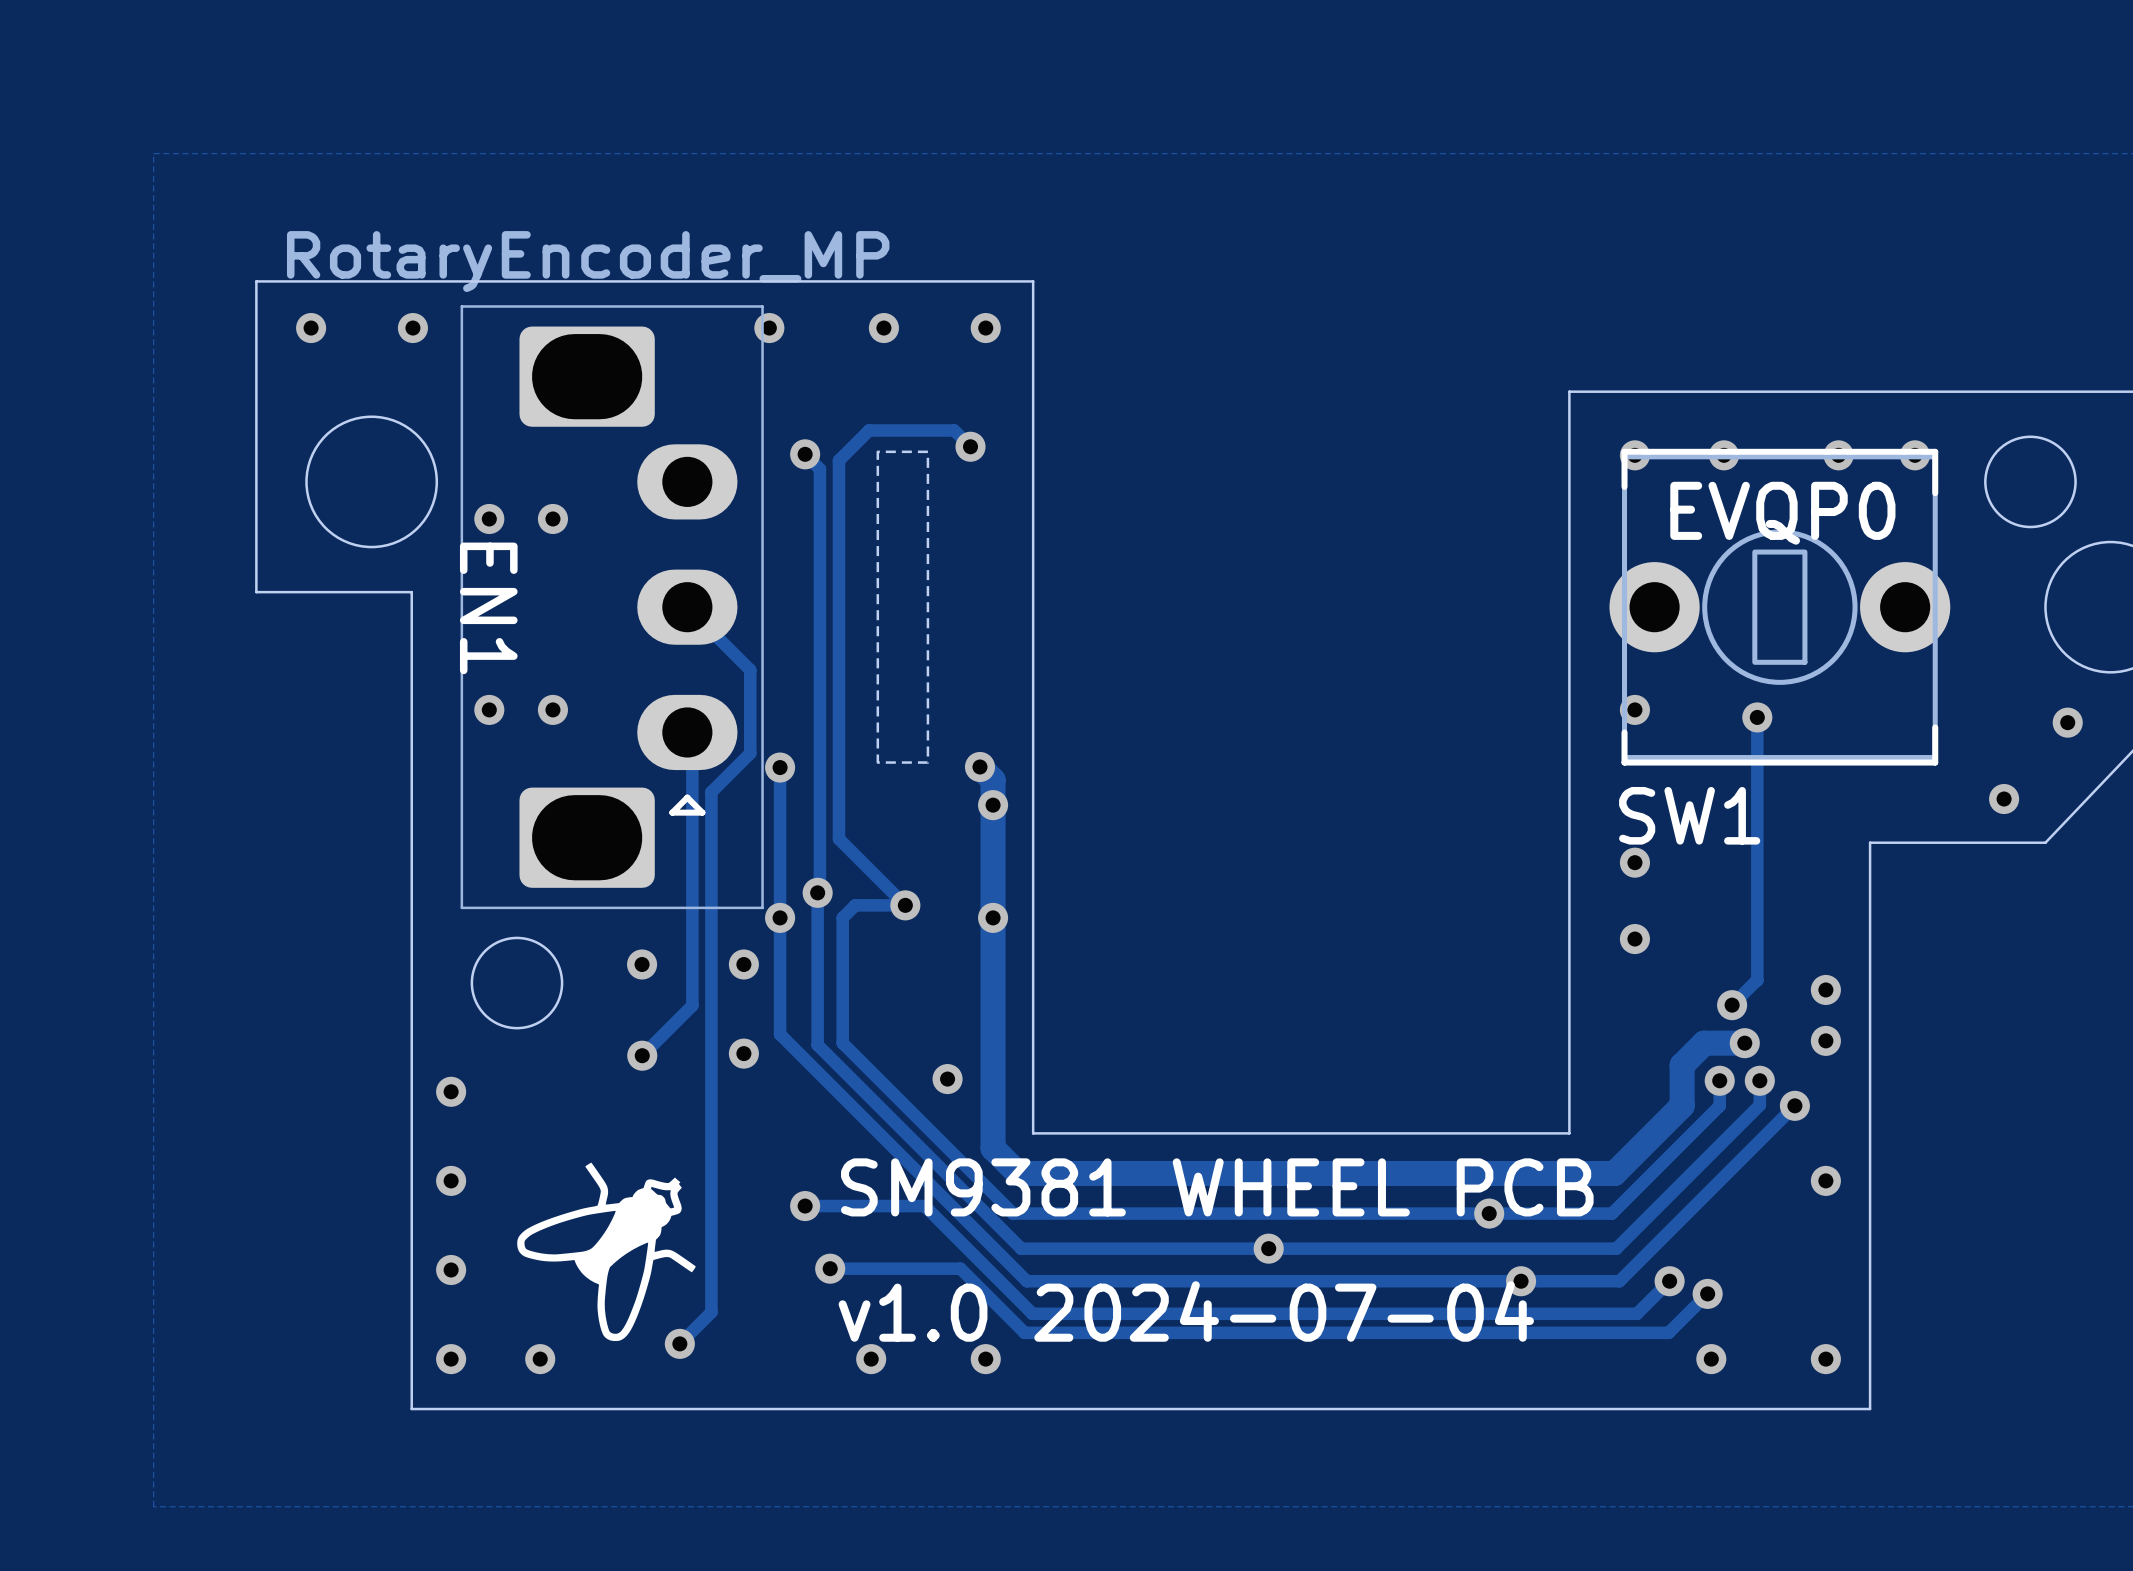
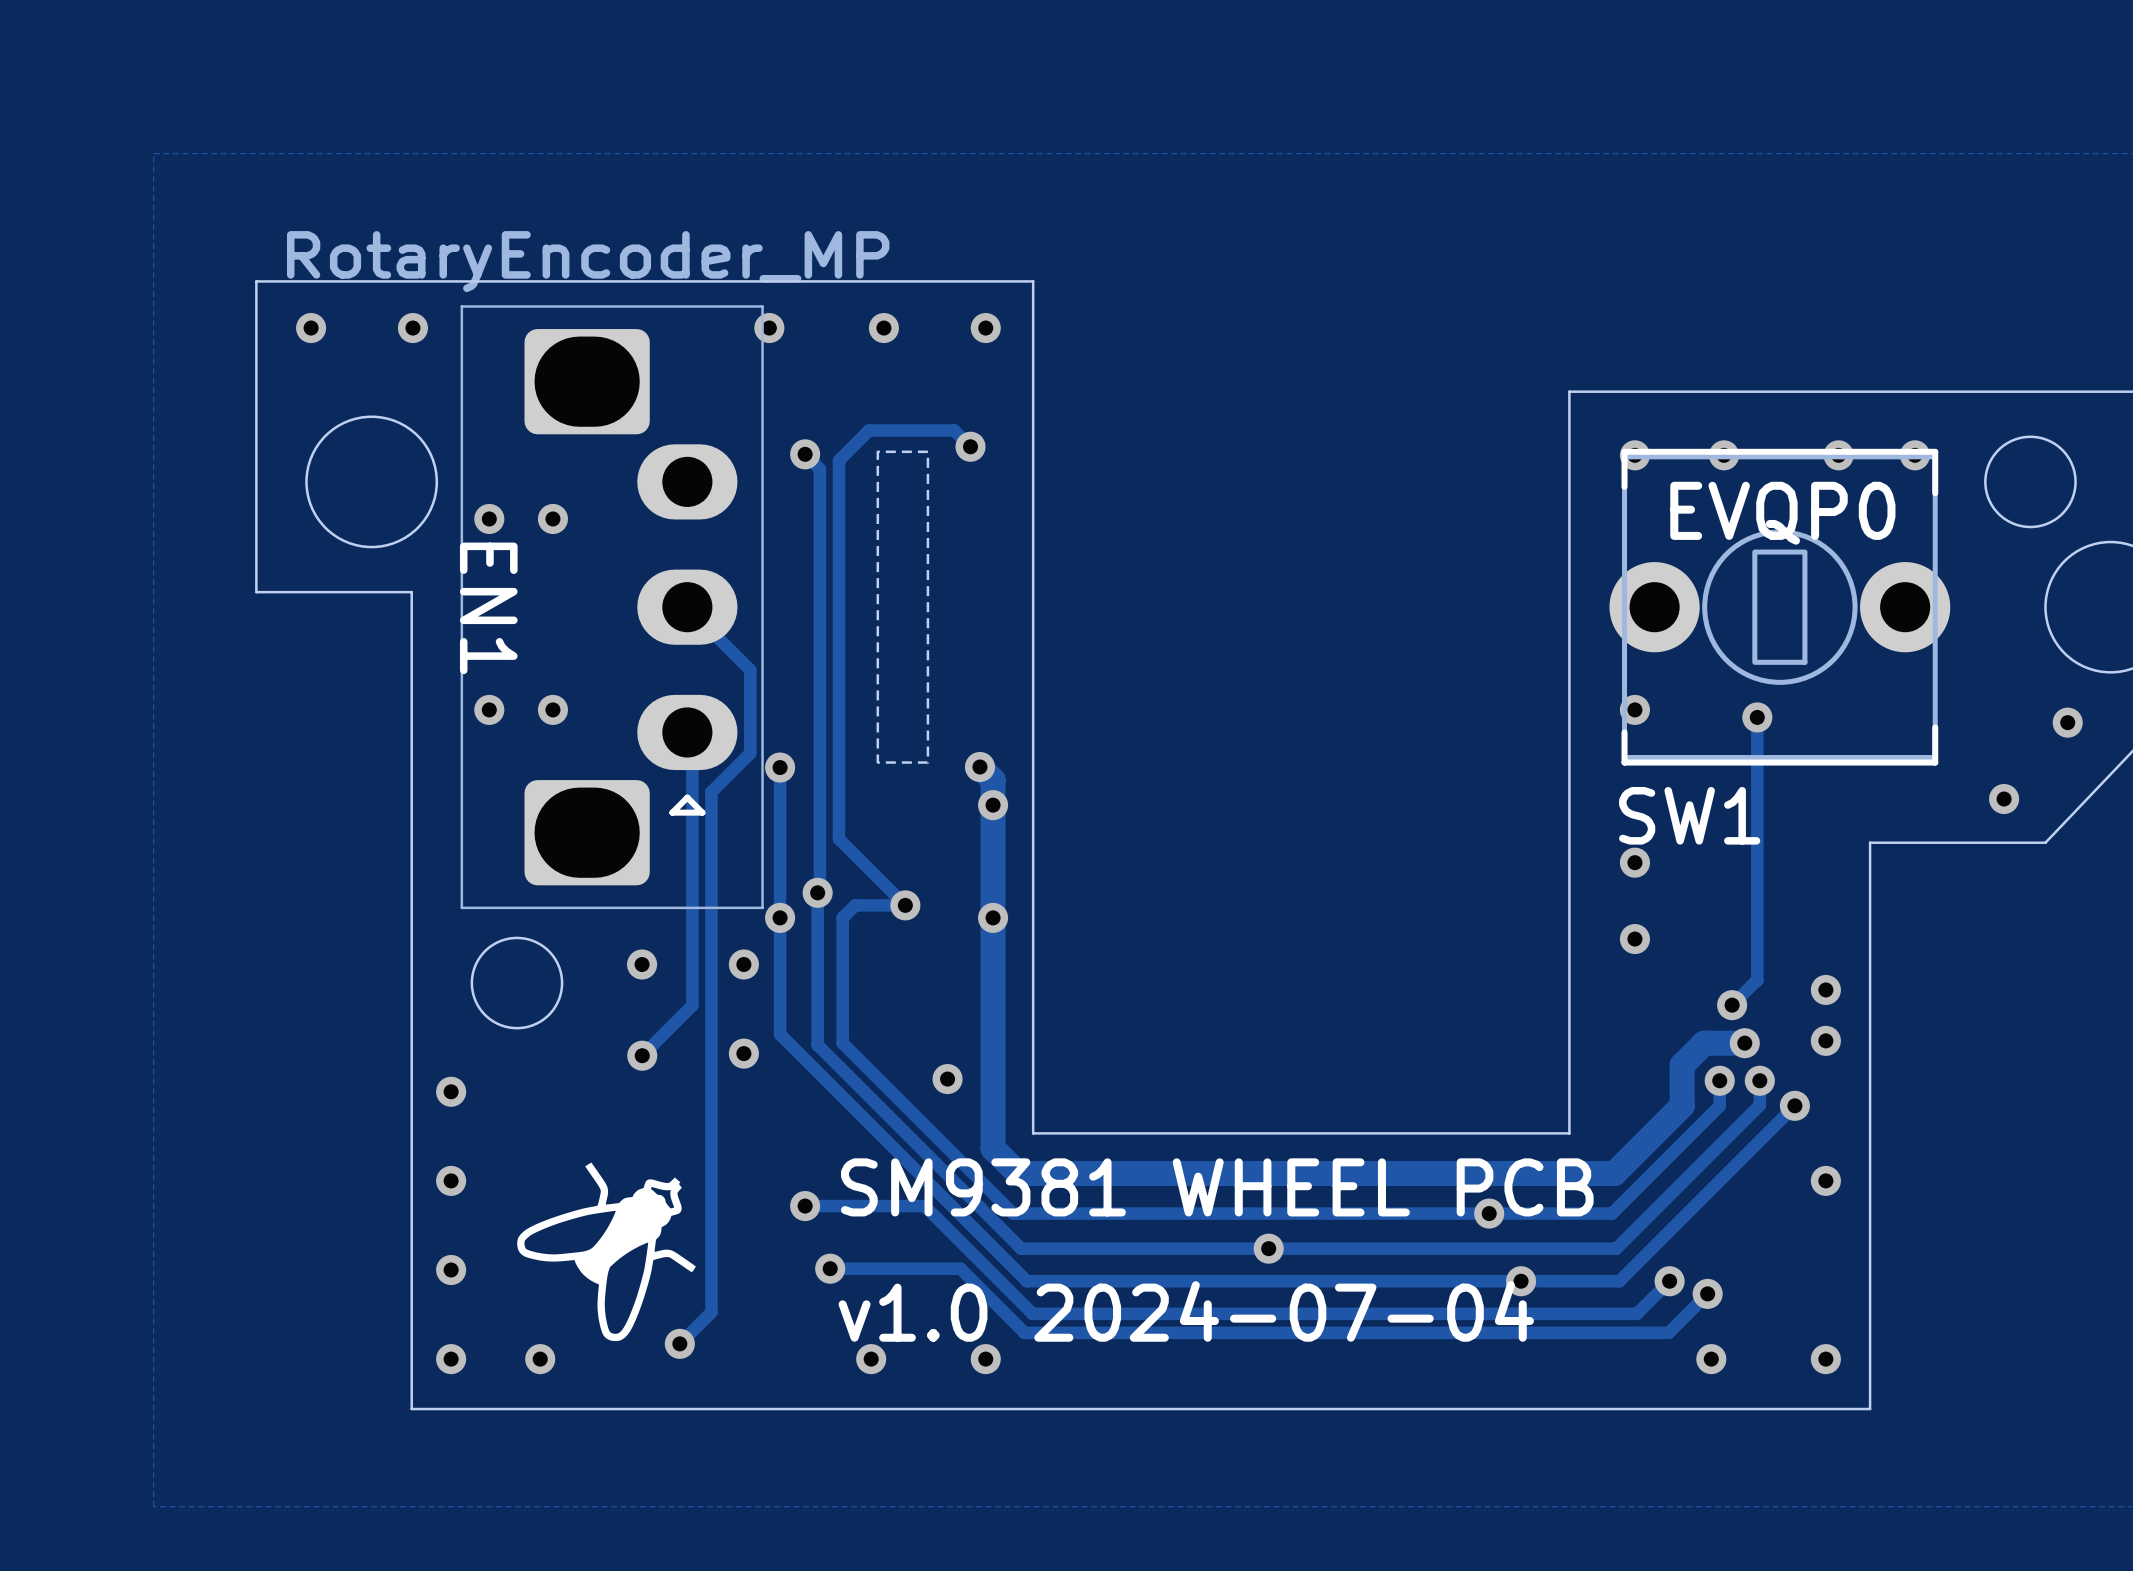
EN1 footprint: [460, 305, 764, 910] -> [460, 305, 764, 910]

